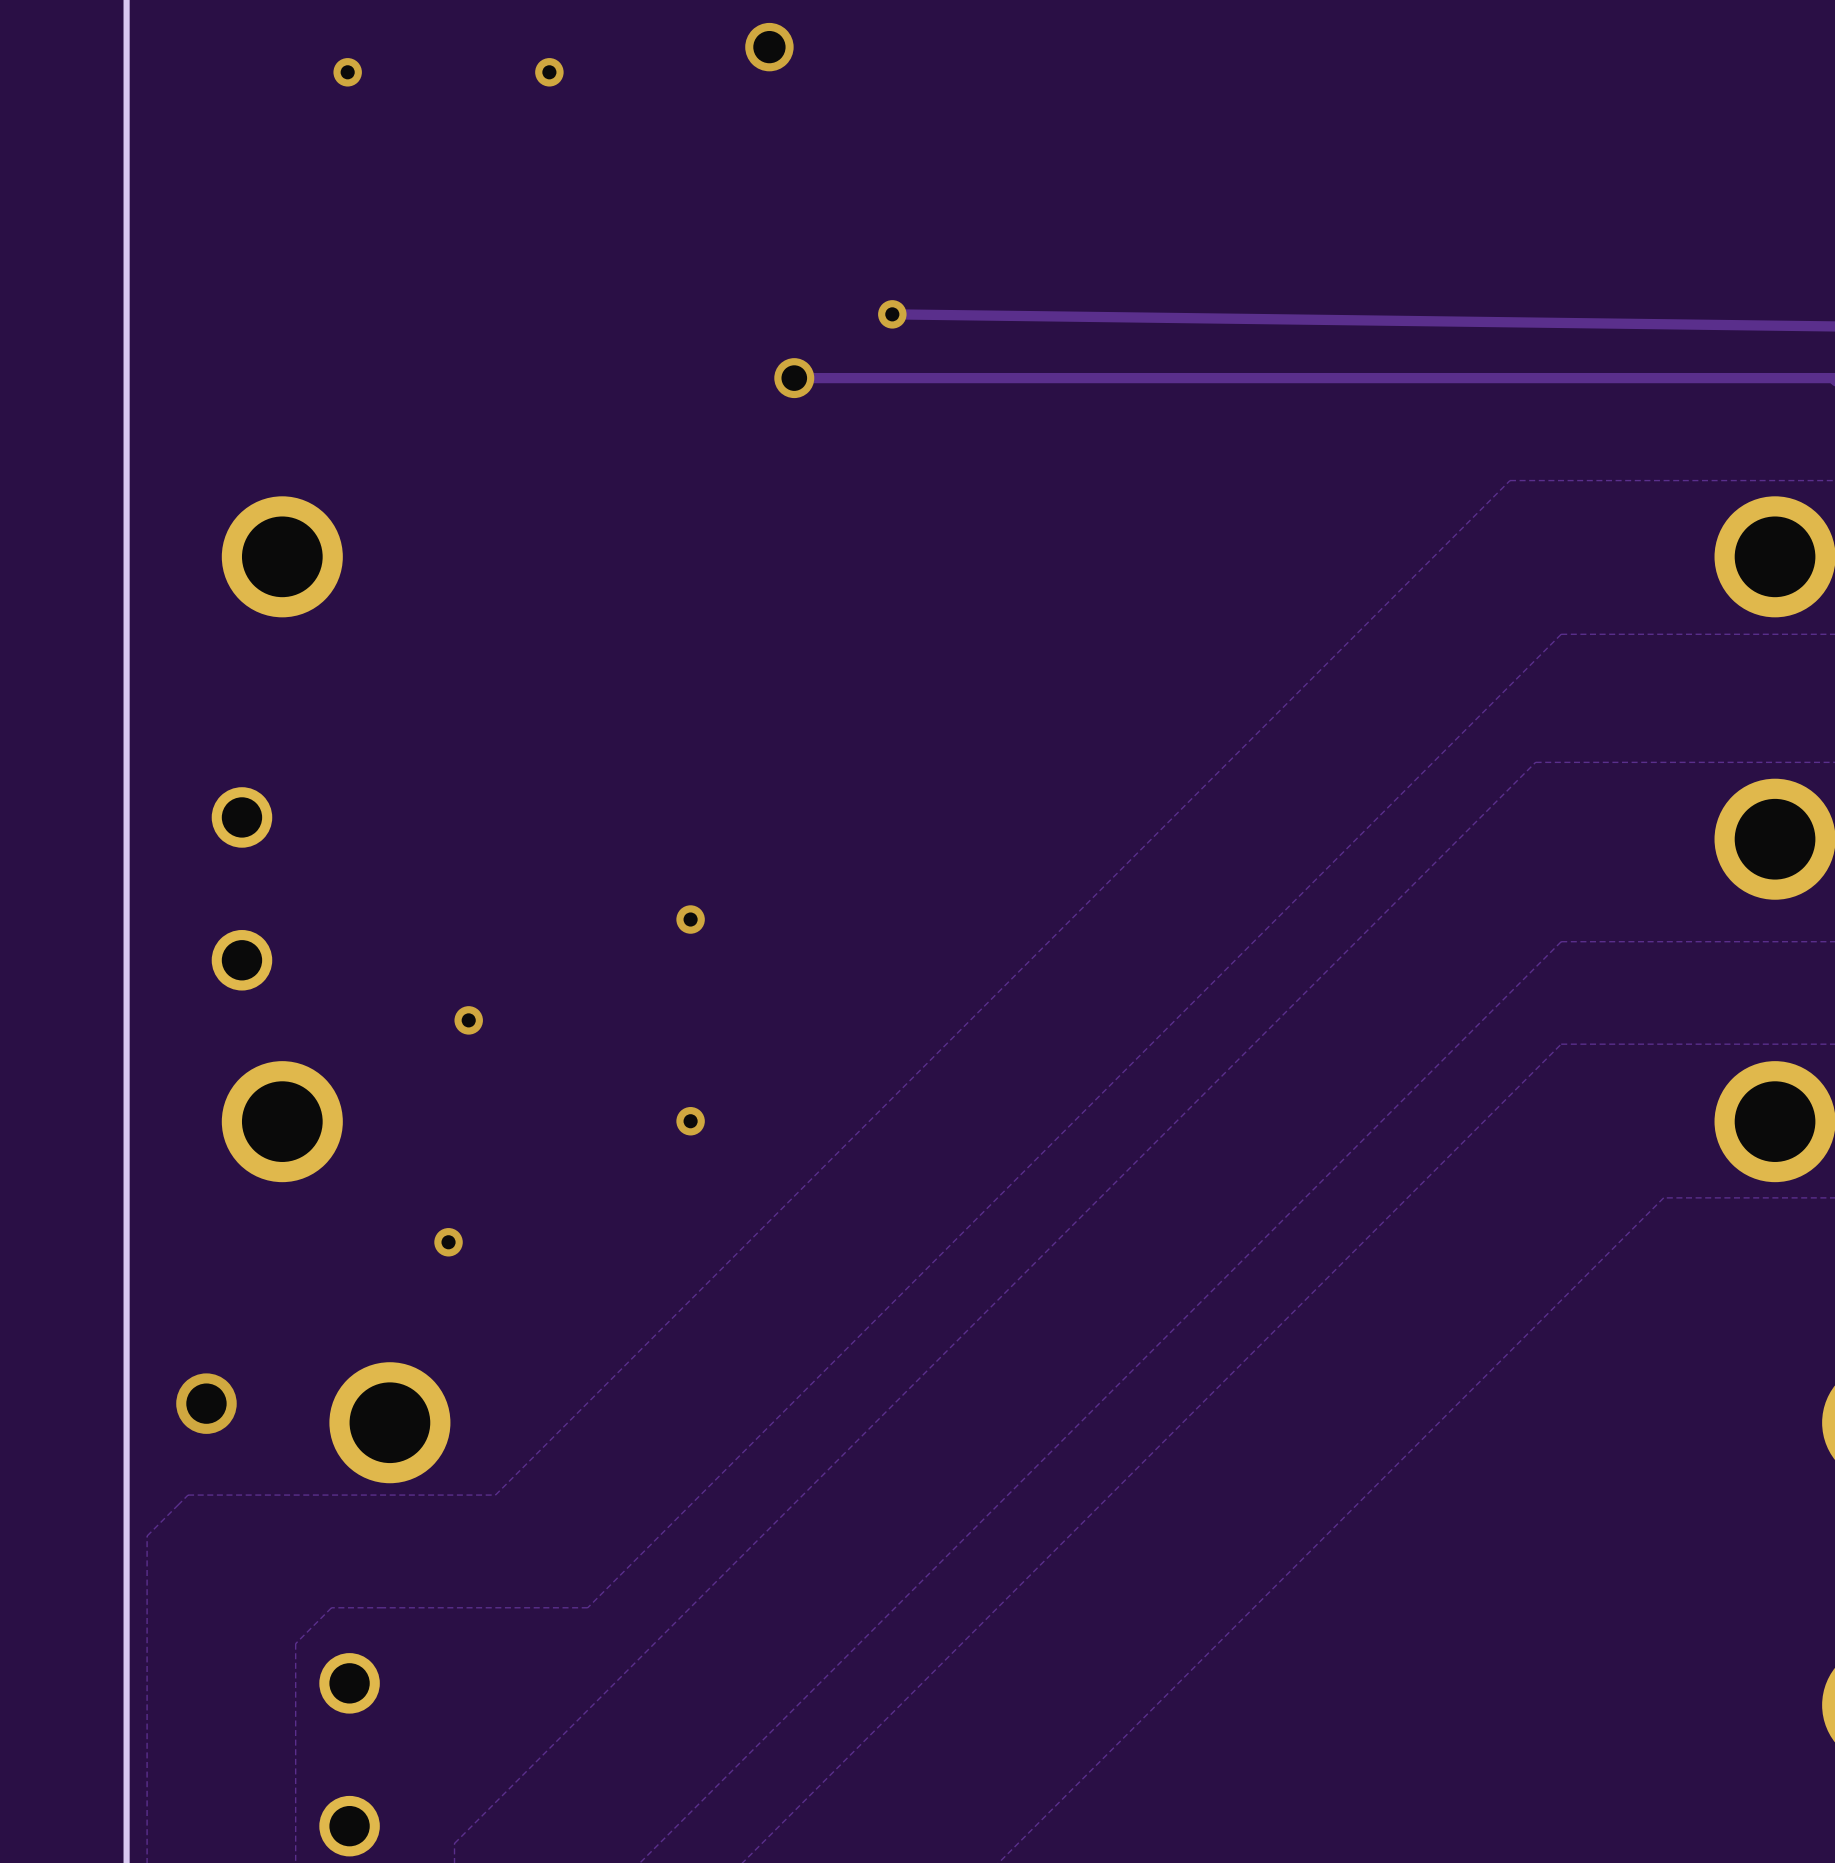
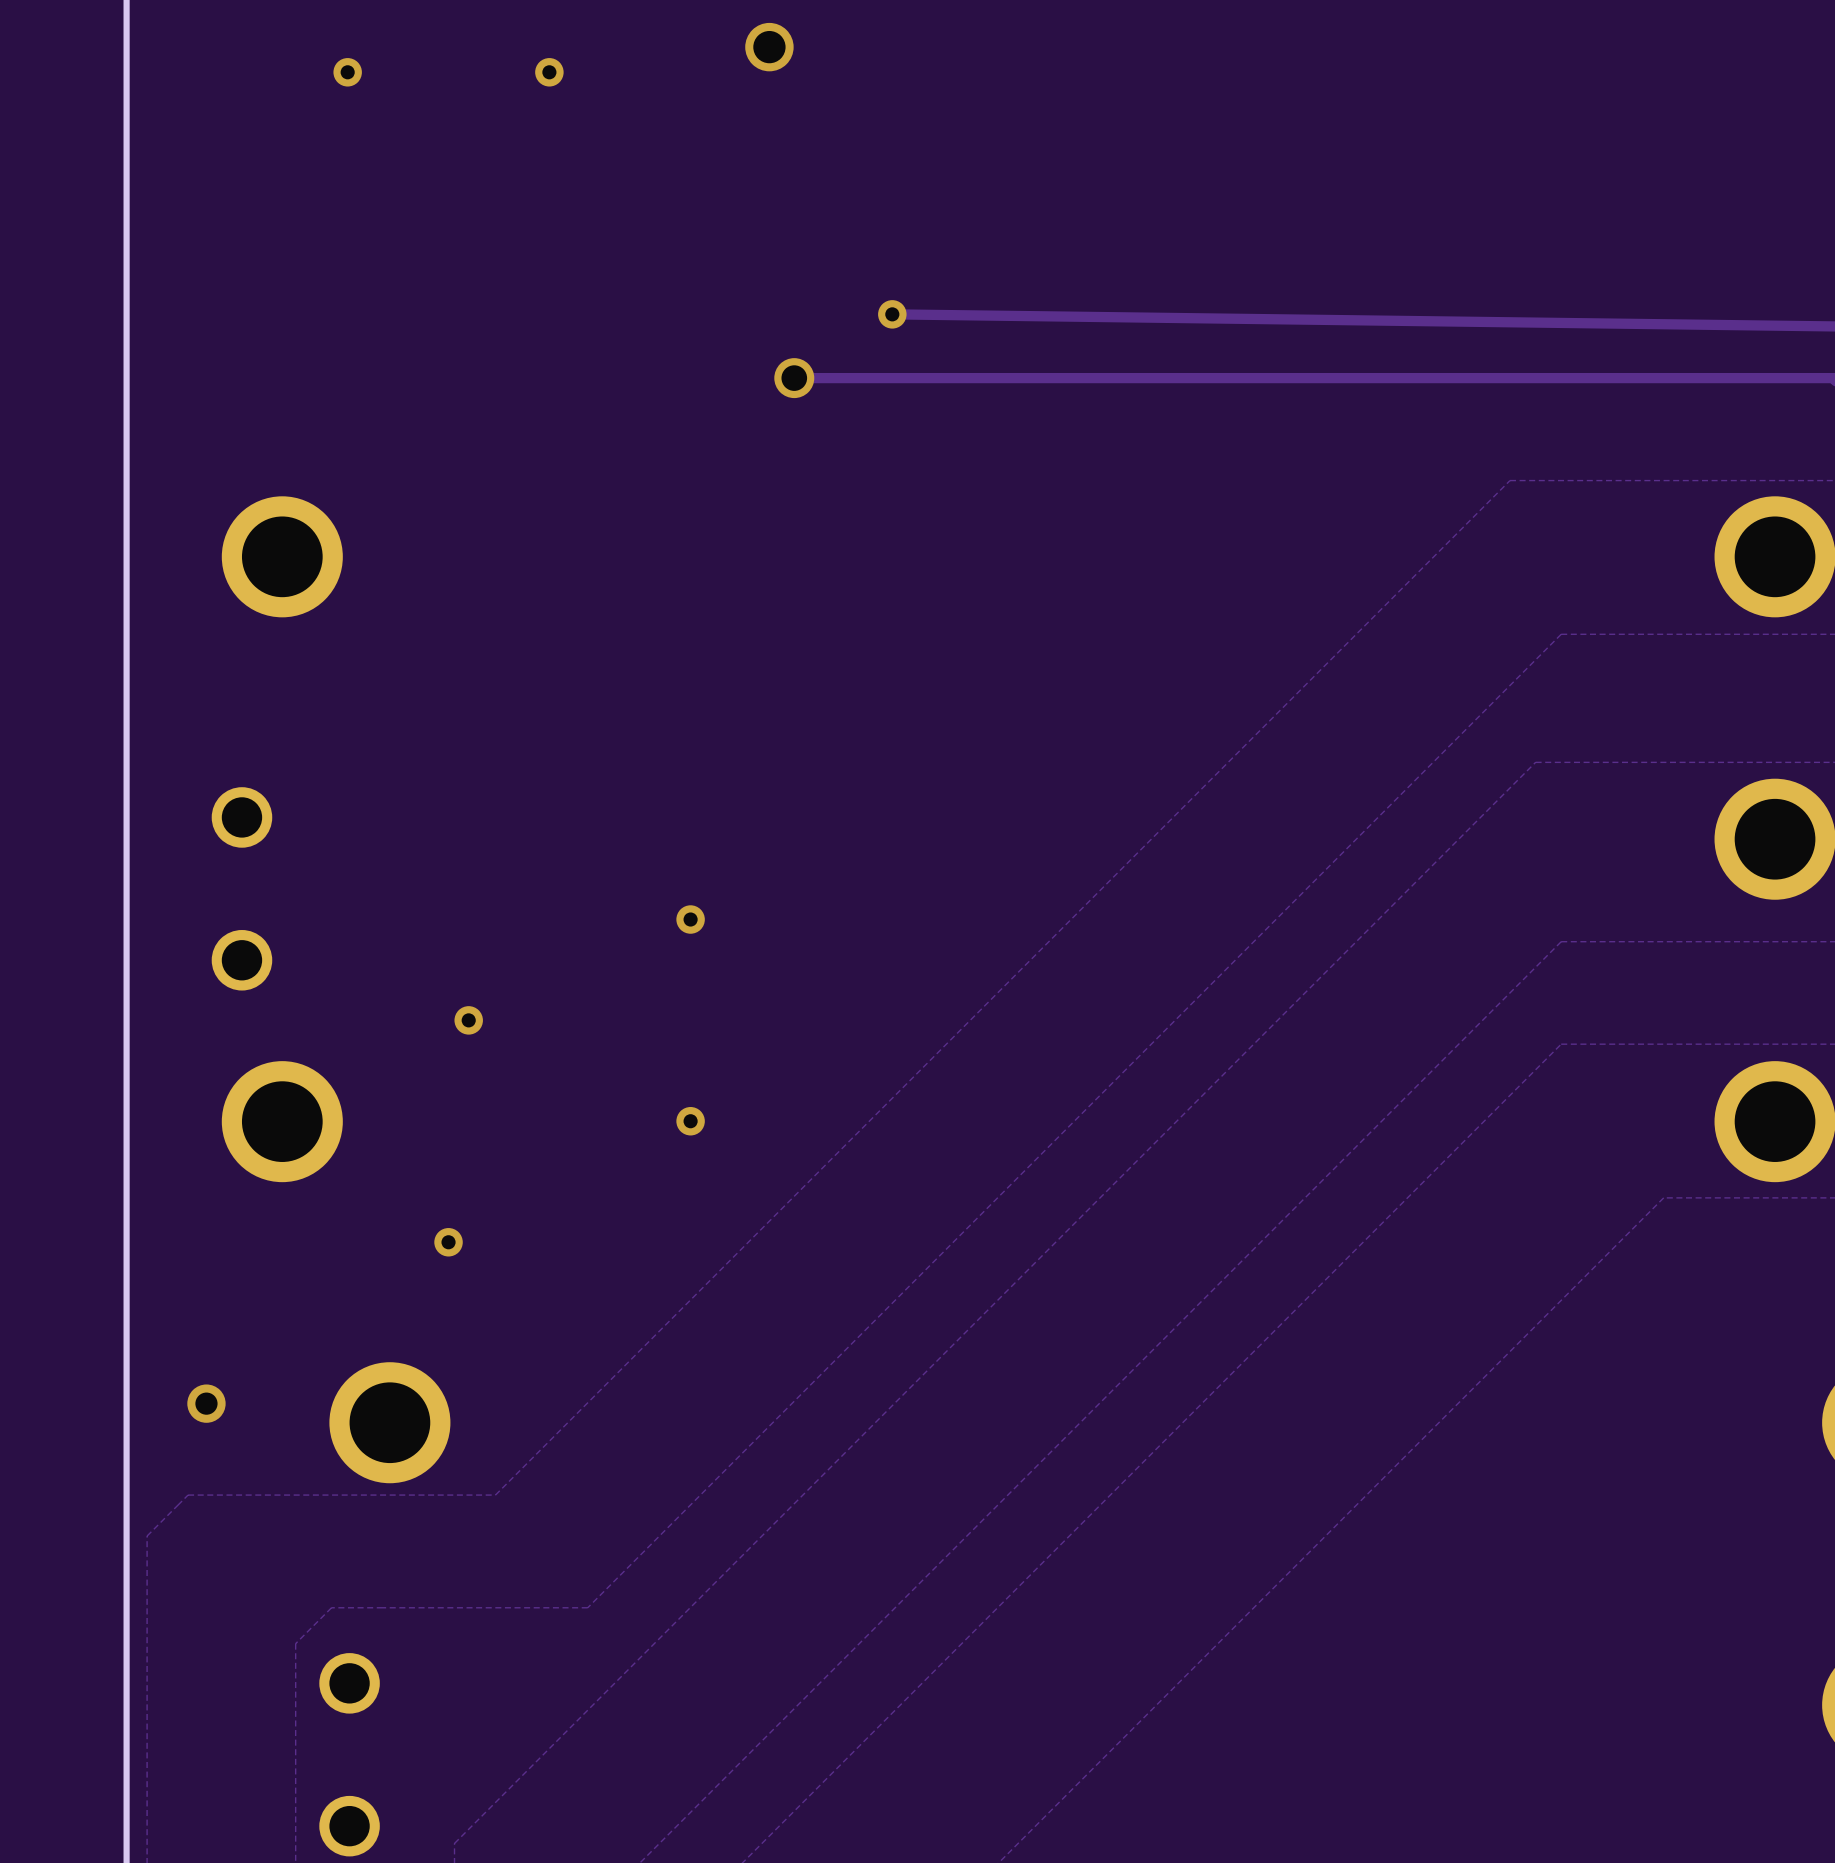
via size: [176, 1373, 237, 1434] -> [187, 1384, 226, 1423]

